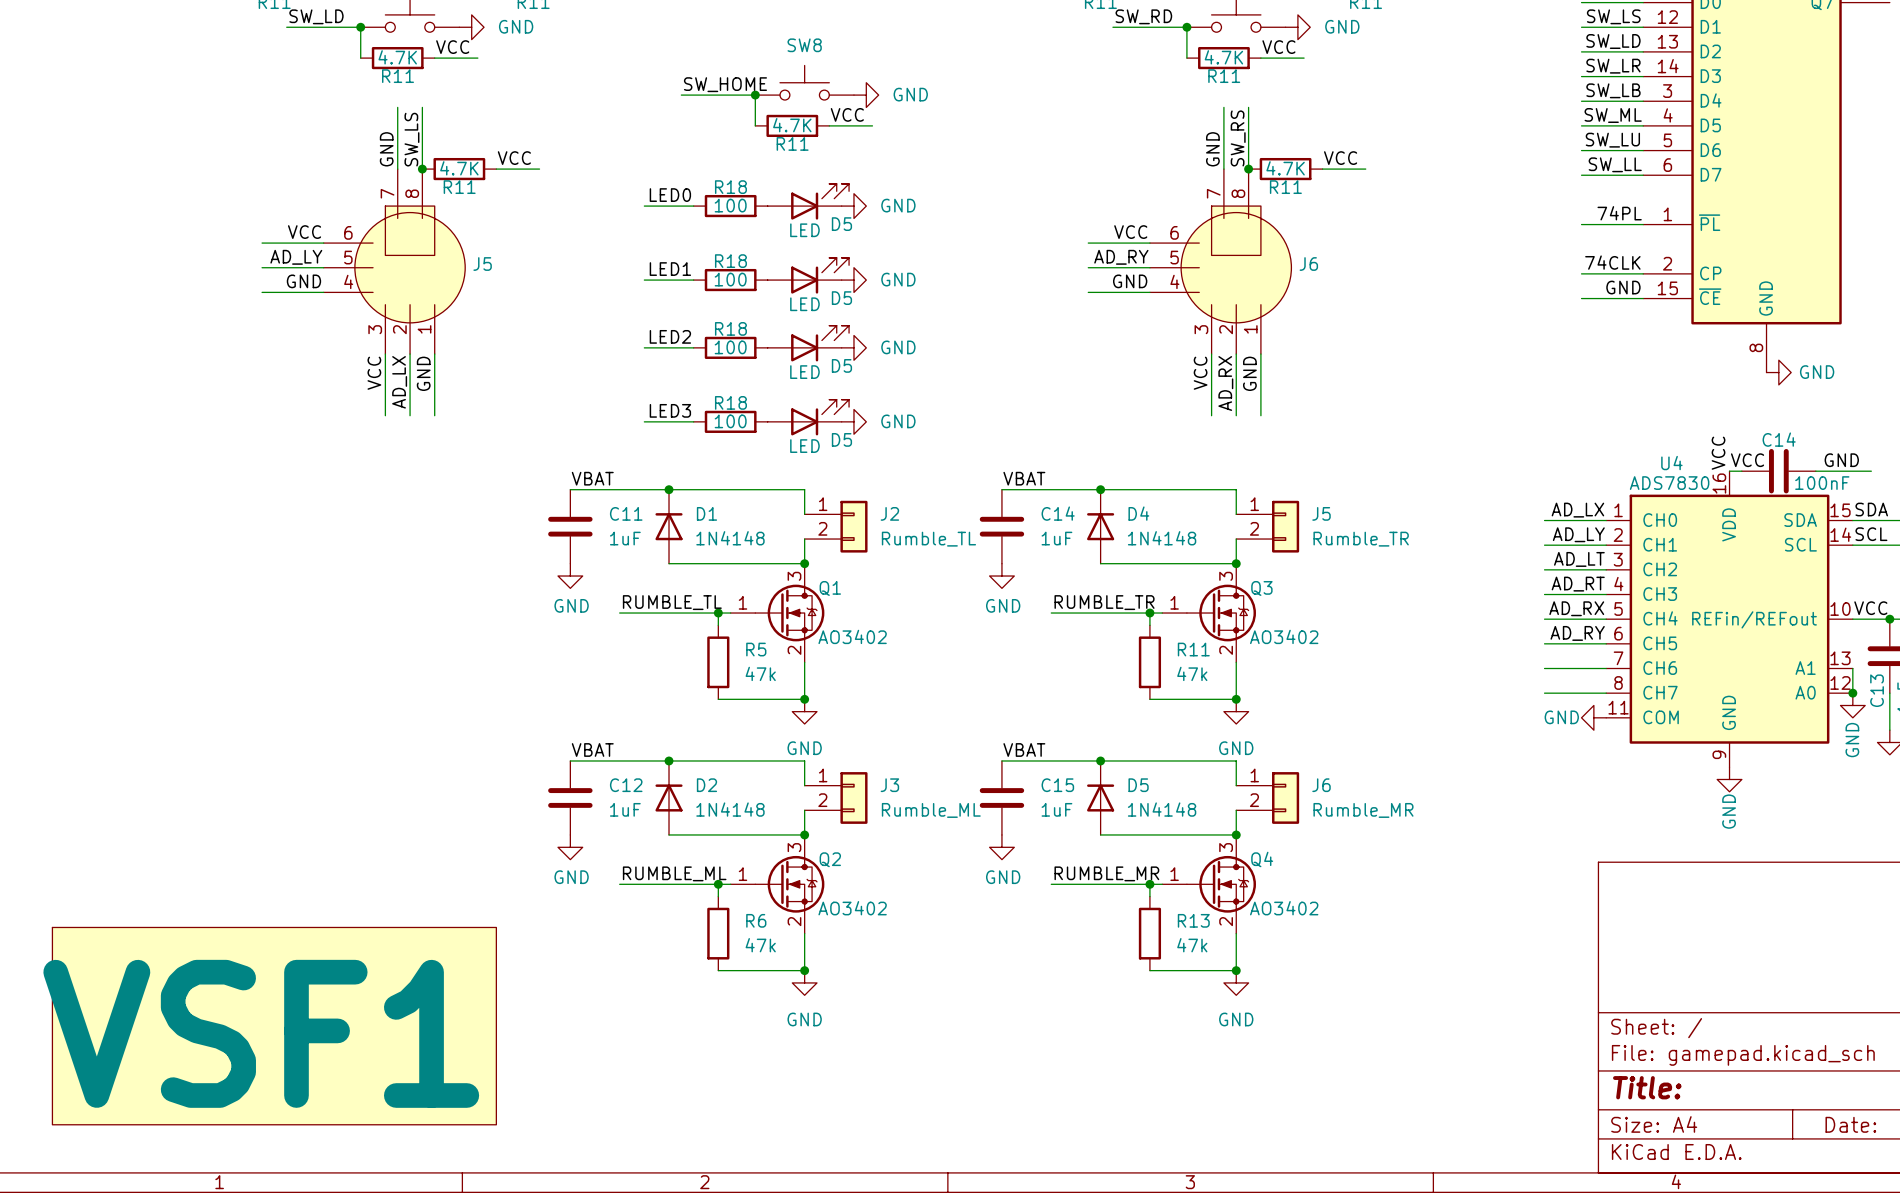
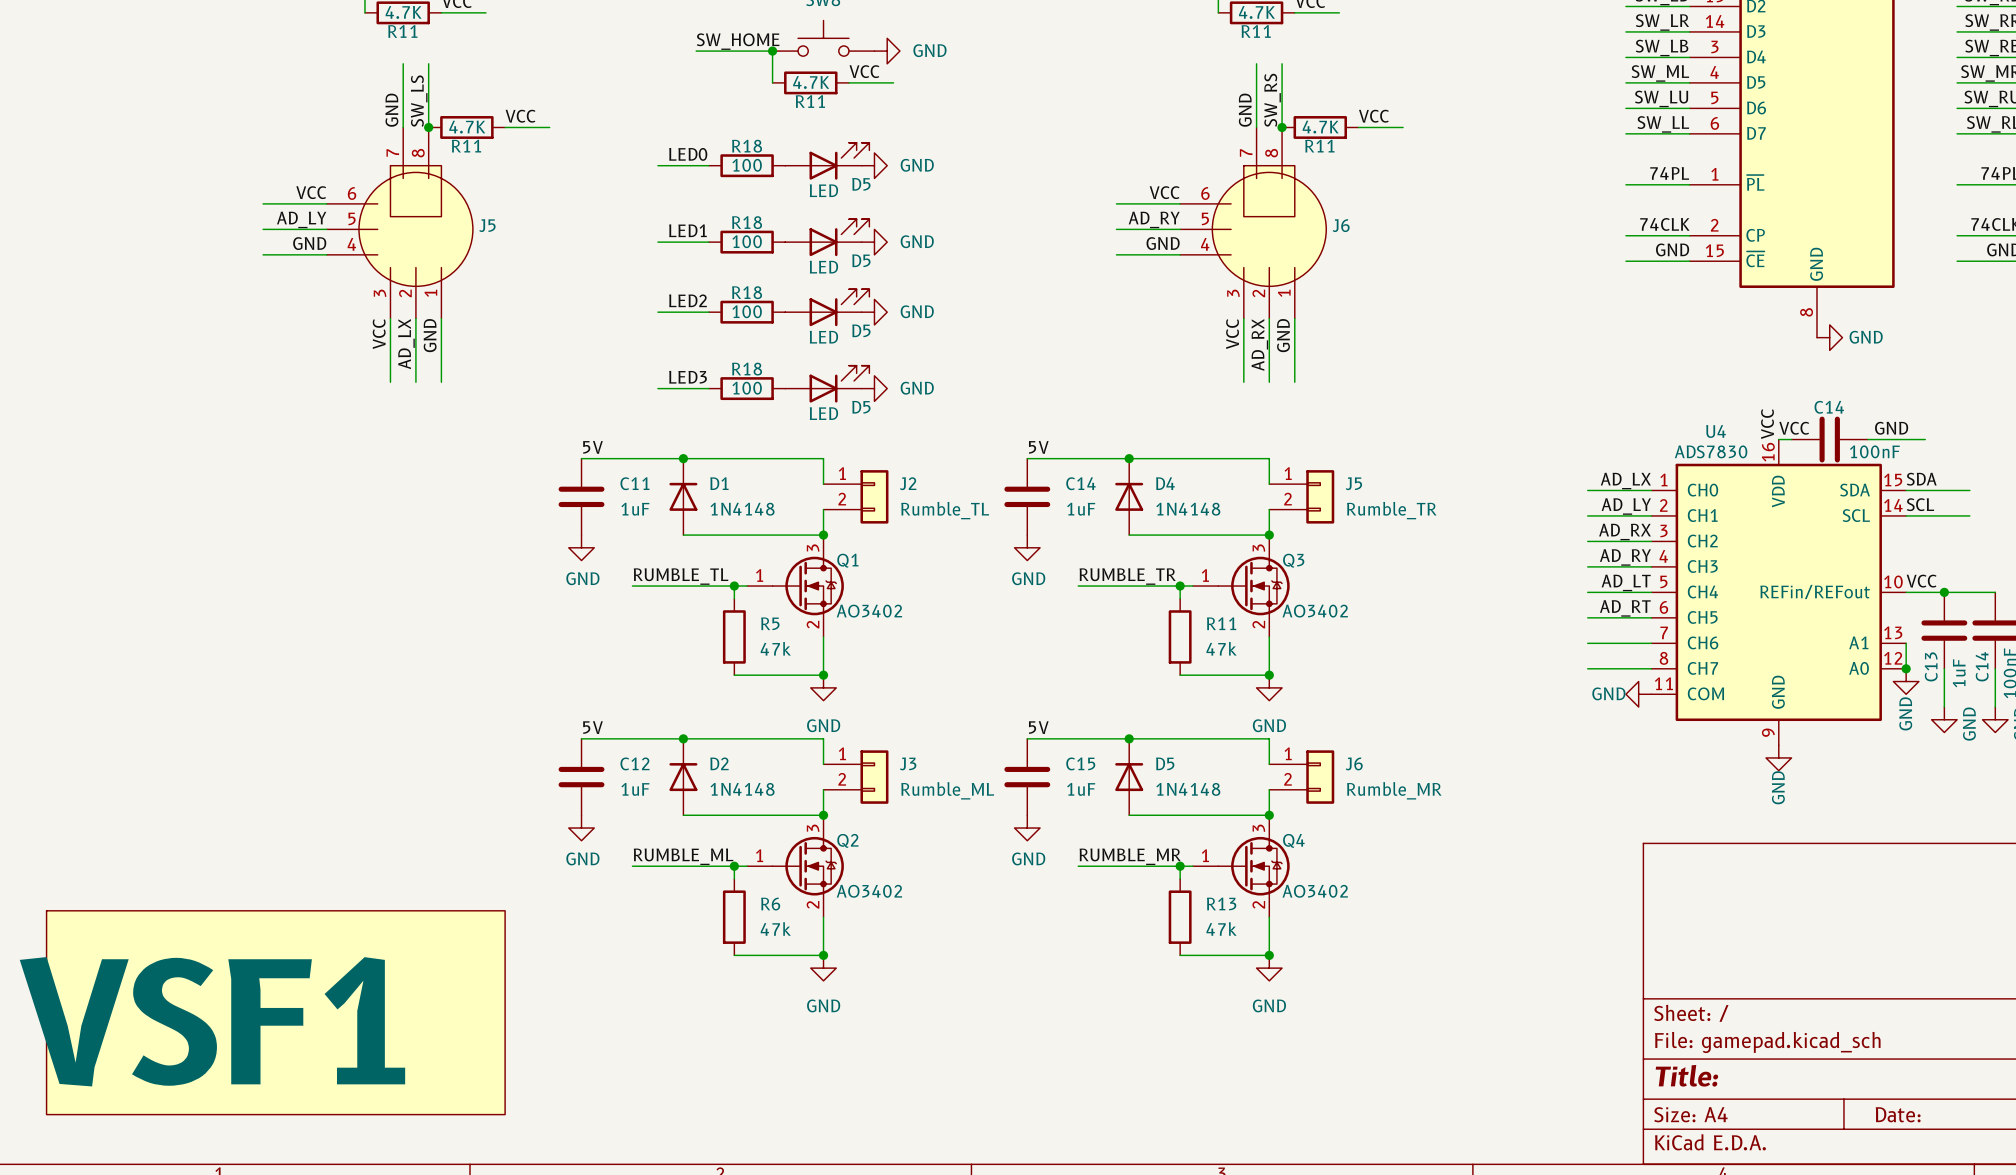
label: VBAT (592, 478) -> 5V (592, 447)
label: VBAT (1024, 478) -> 5V (1038, 447)
label: AD_LT (1579, 559) -> AD_RX (1625, 531)
label: AD_RT (1578, 584) -> AD_RY (1625, 557)
label: AD_RX (1576, 608) -> AD_LT (1626, 582)
label: AD_RY (1577, 633) -> AD_RT (1625, 608)
label: VBAT (592, 749) -> 5V (592, 727)
label: VBAT (1024, 749) -> 5V (1038, 727)

